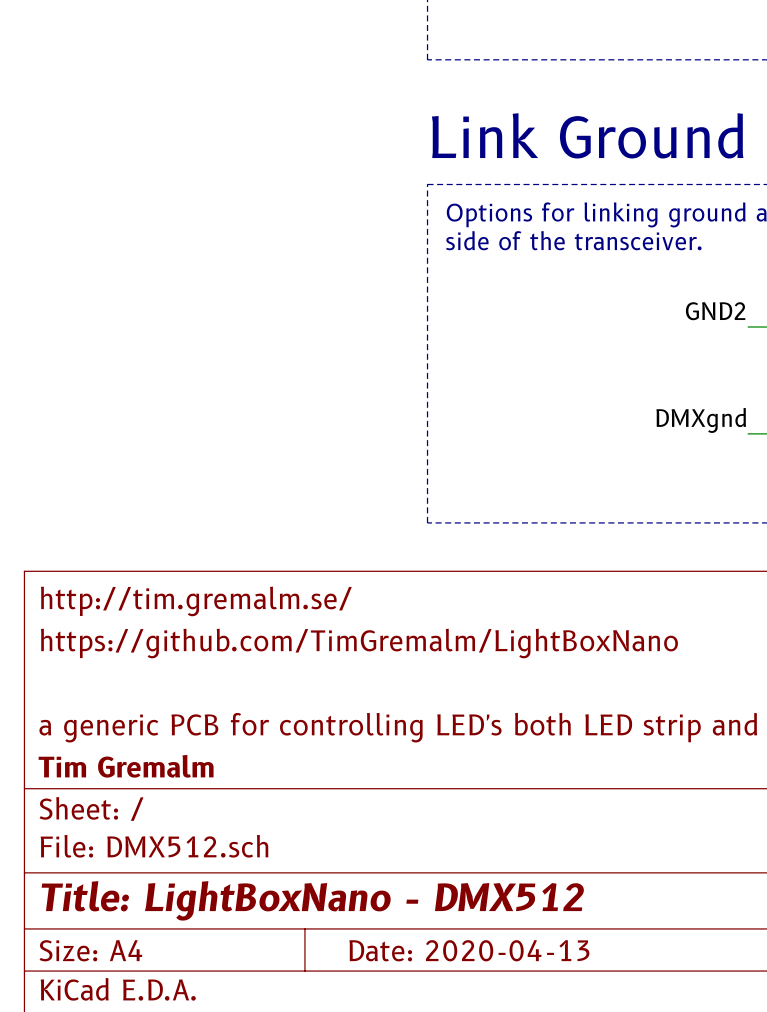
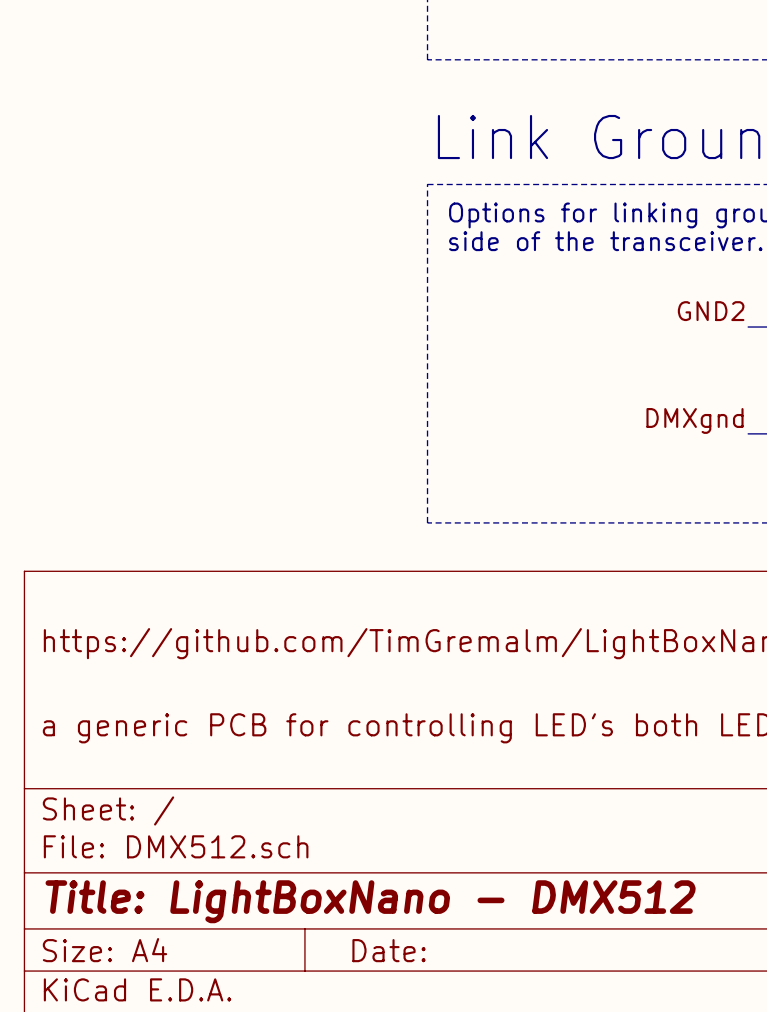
title block: http://tim.gremalm.se/ (196, 601) -> none
title block: Tim Gremalm (126, 766) -> none
title block: Date: 2020-04-13 (469, 950) -> Date: (389, 950)

